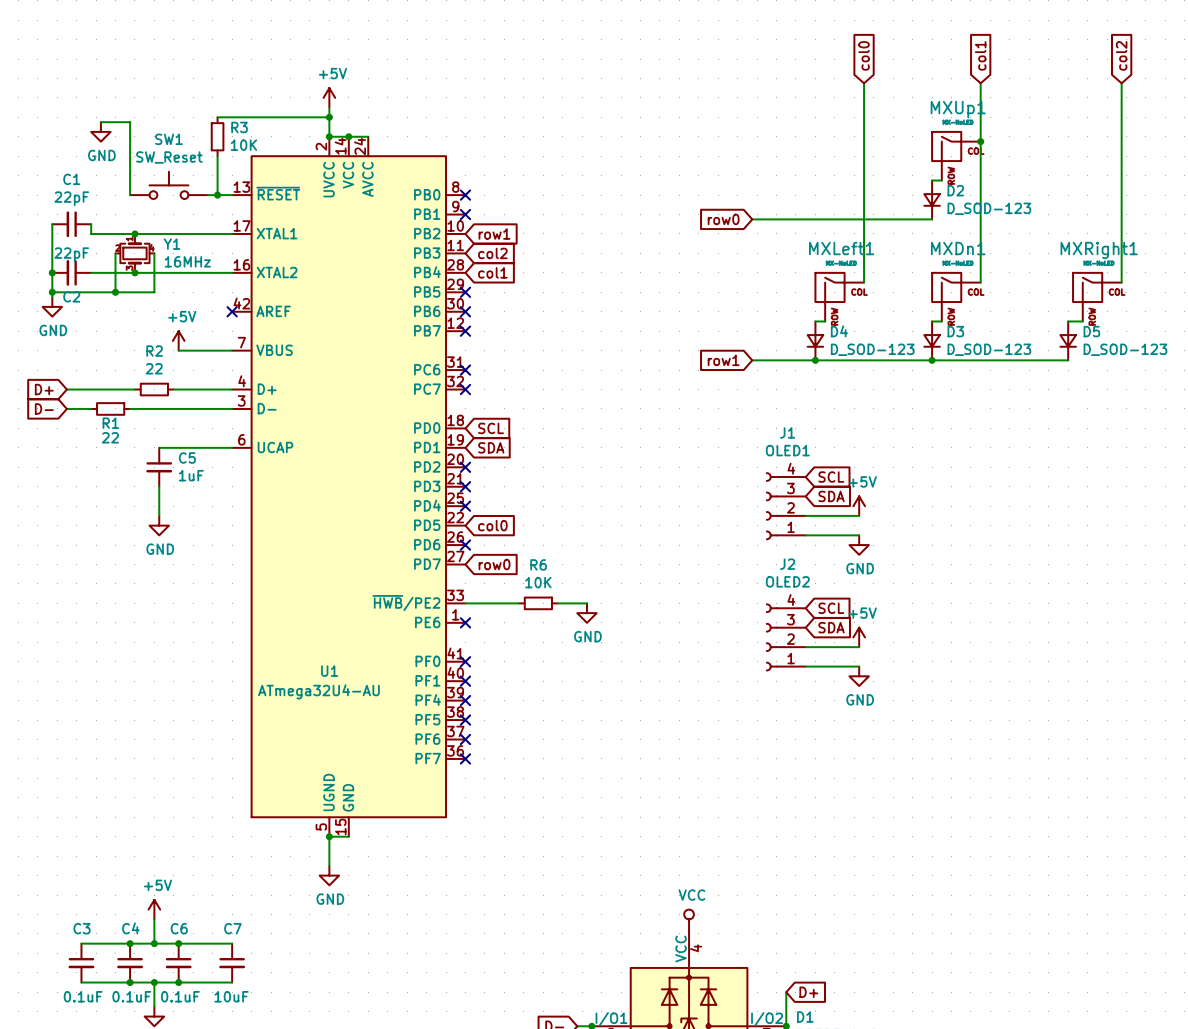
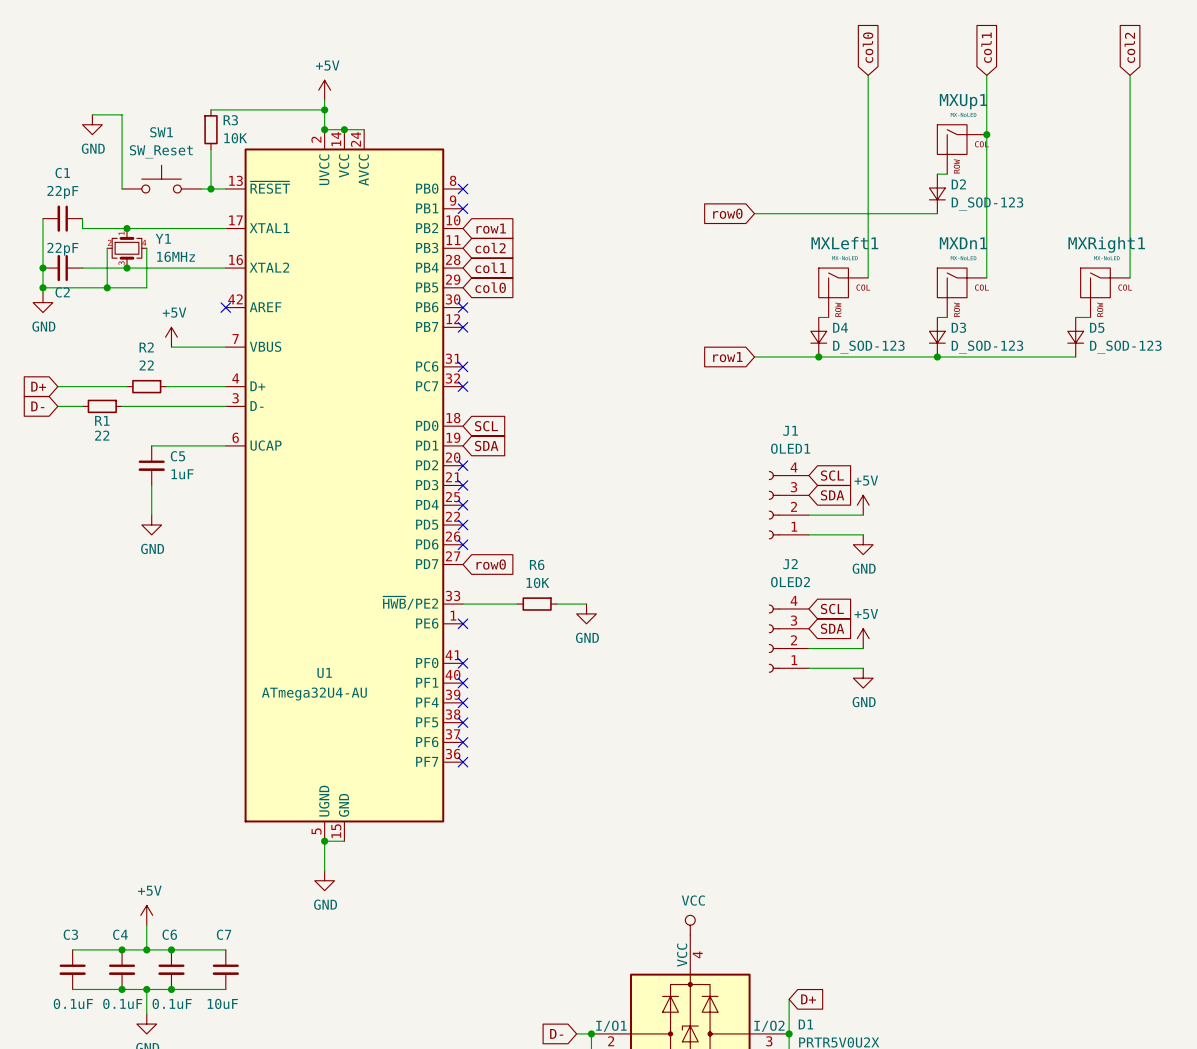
no-connect mark: (465, 292) -> none
global label: none -> col0 (490, 287)
no-connect mark: none -> (462, 524)
global label: col0 (492, 525) -> none

